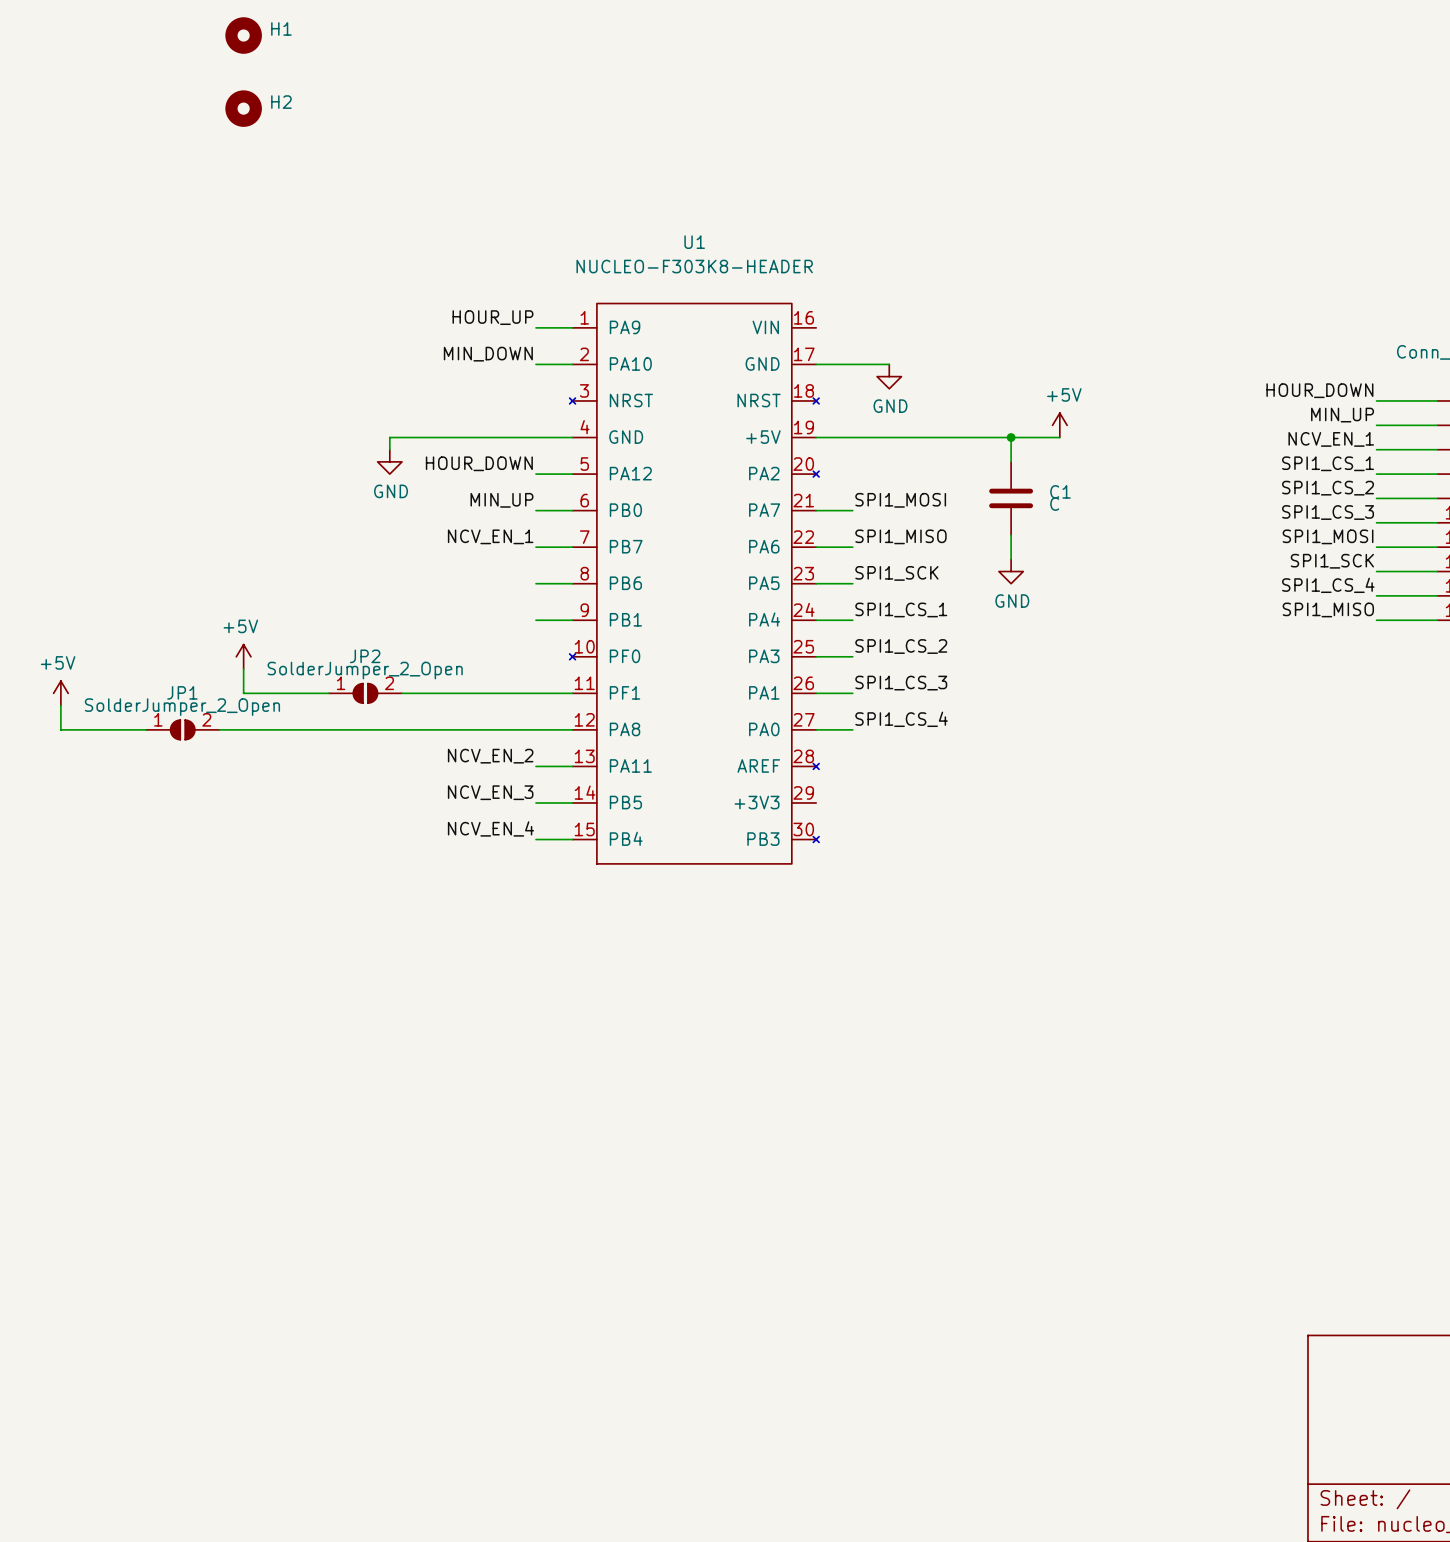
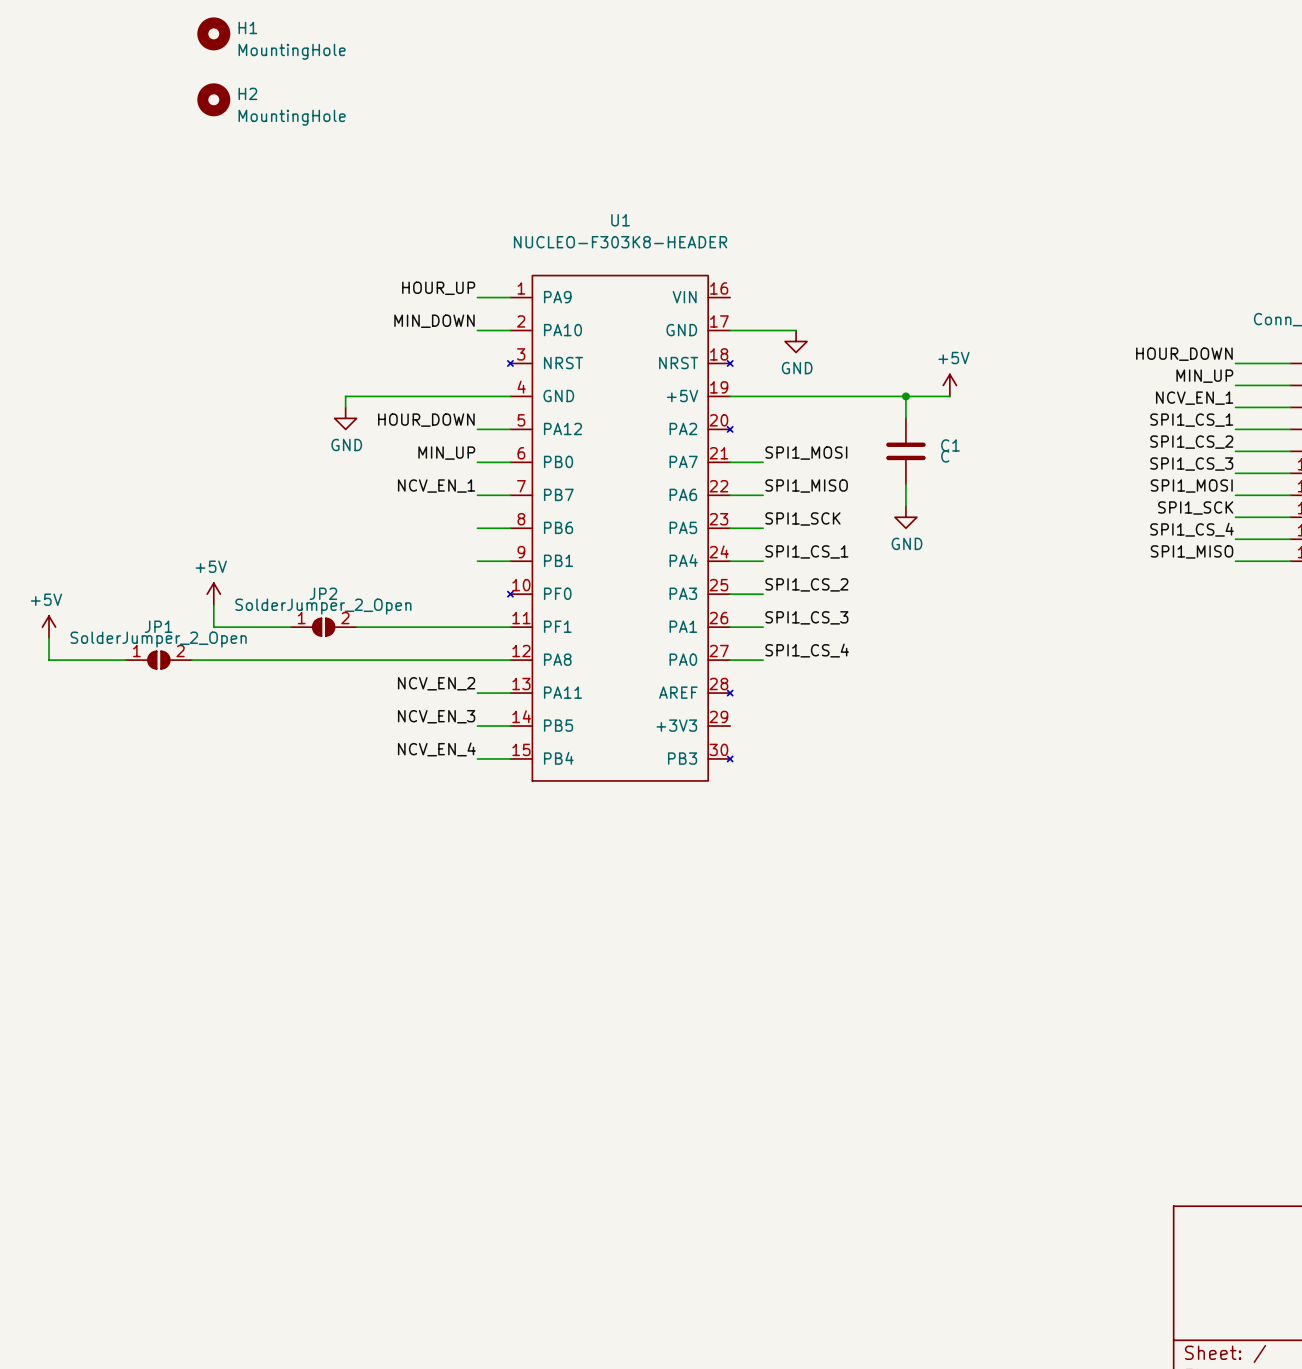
H1 value: none -> MountingHole (292, 51)
H2 value: none -> MountingHole (292, 117)

